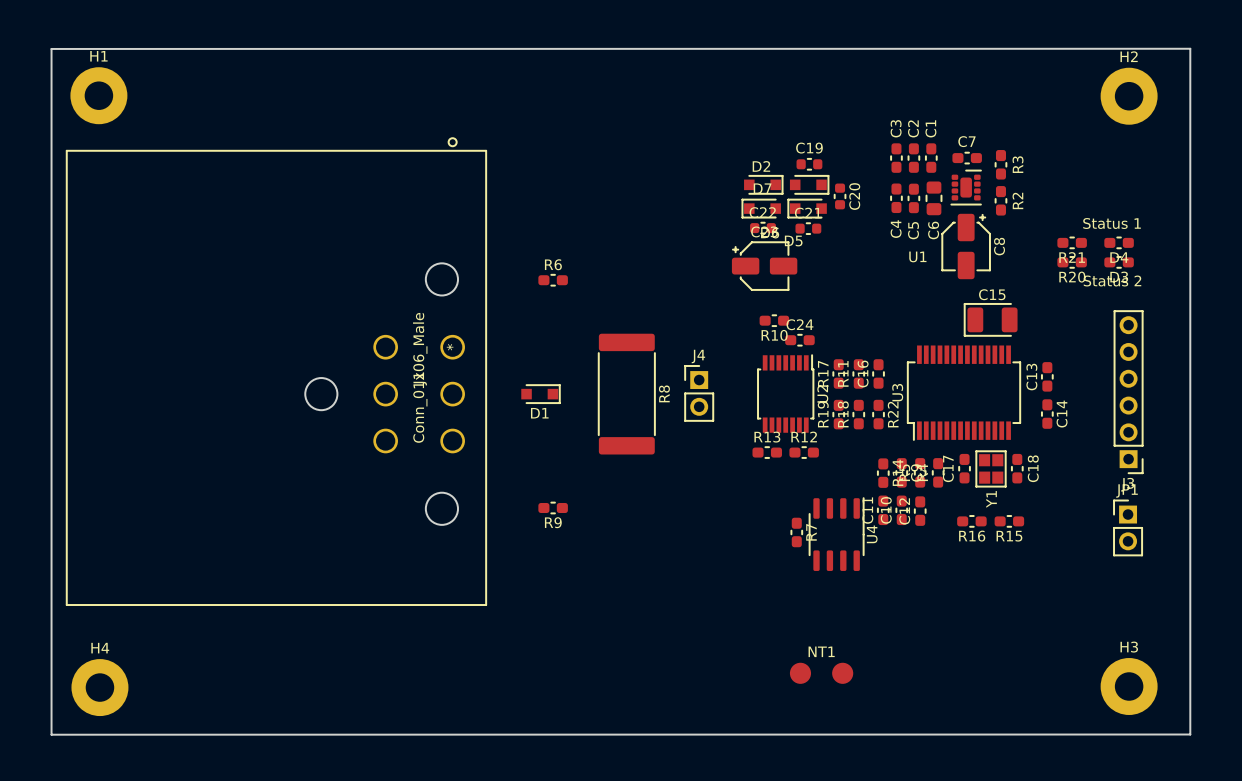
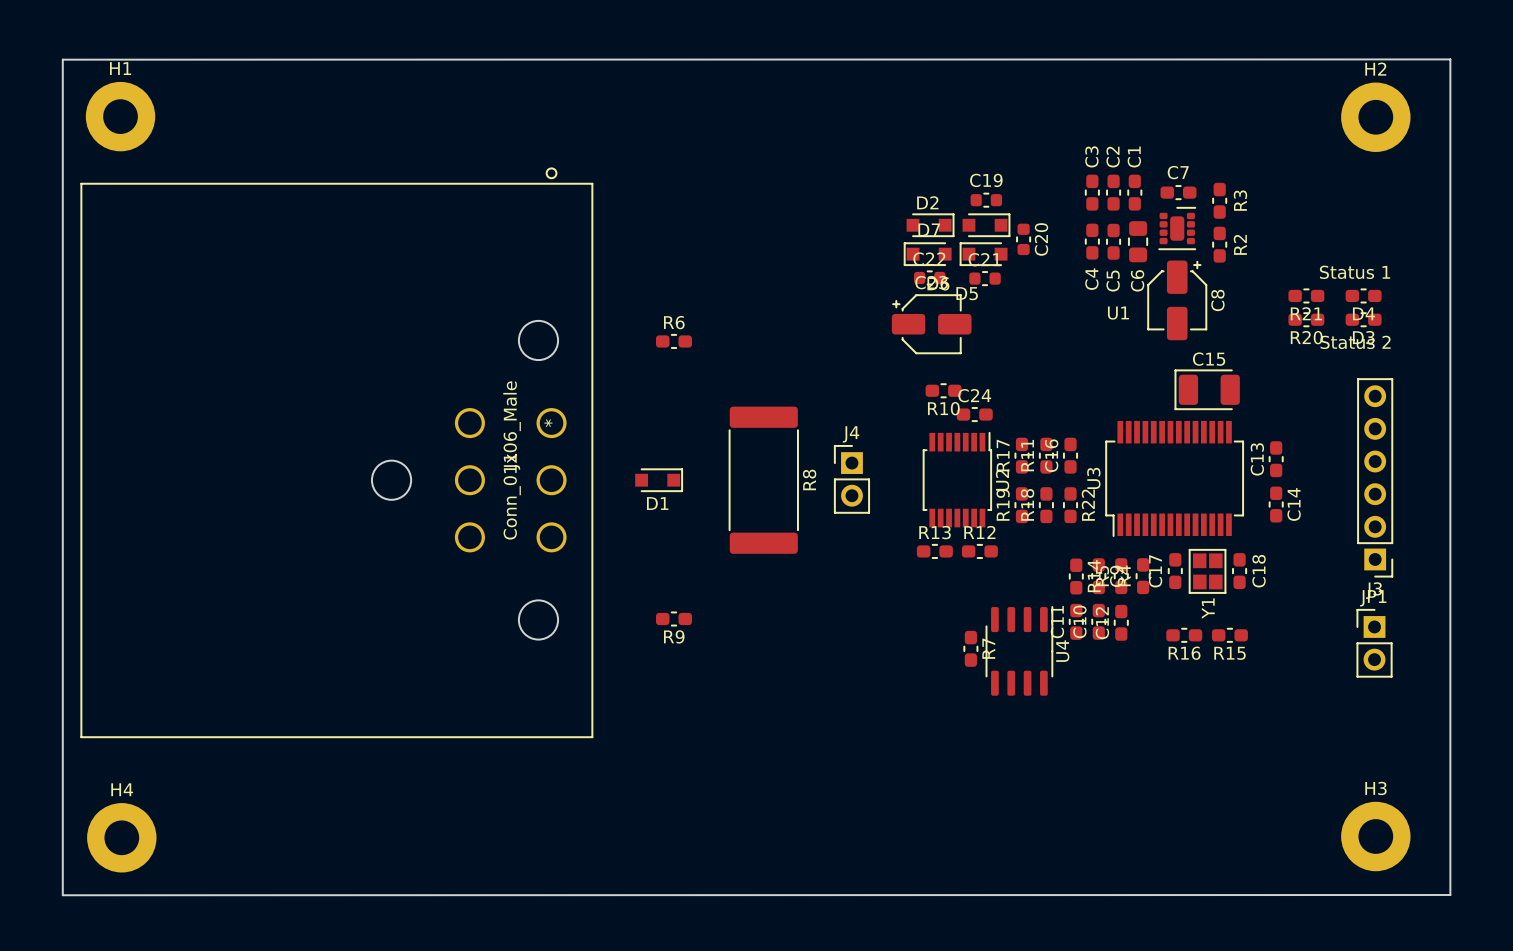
NT1: (821, 673) -> none

